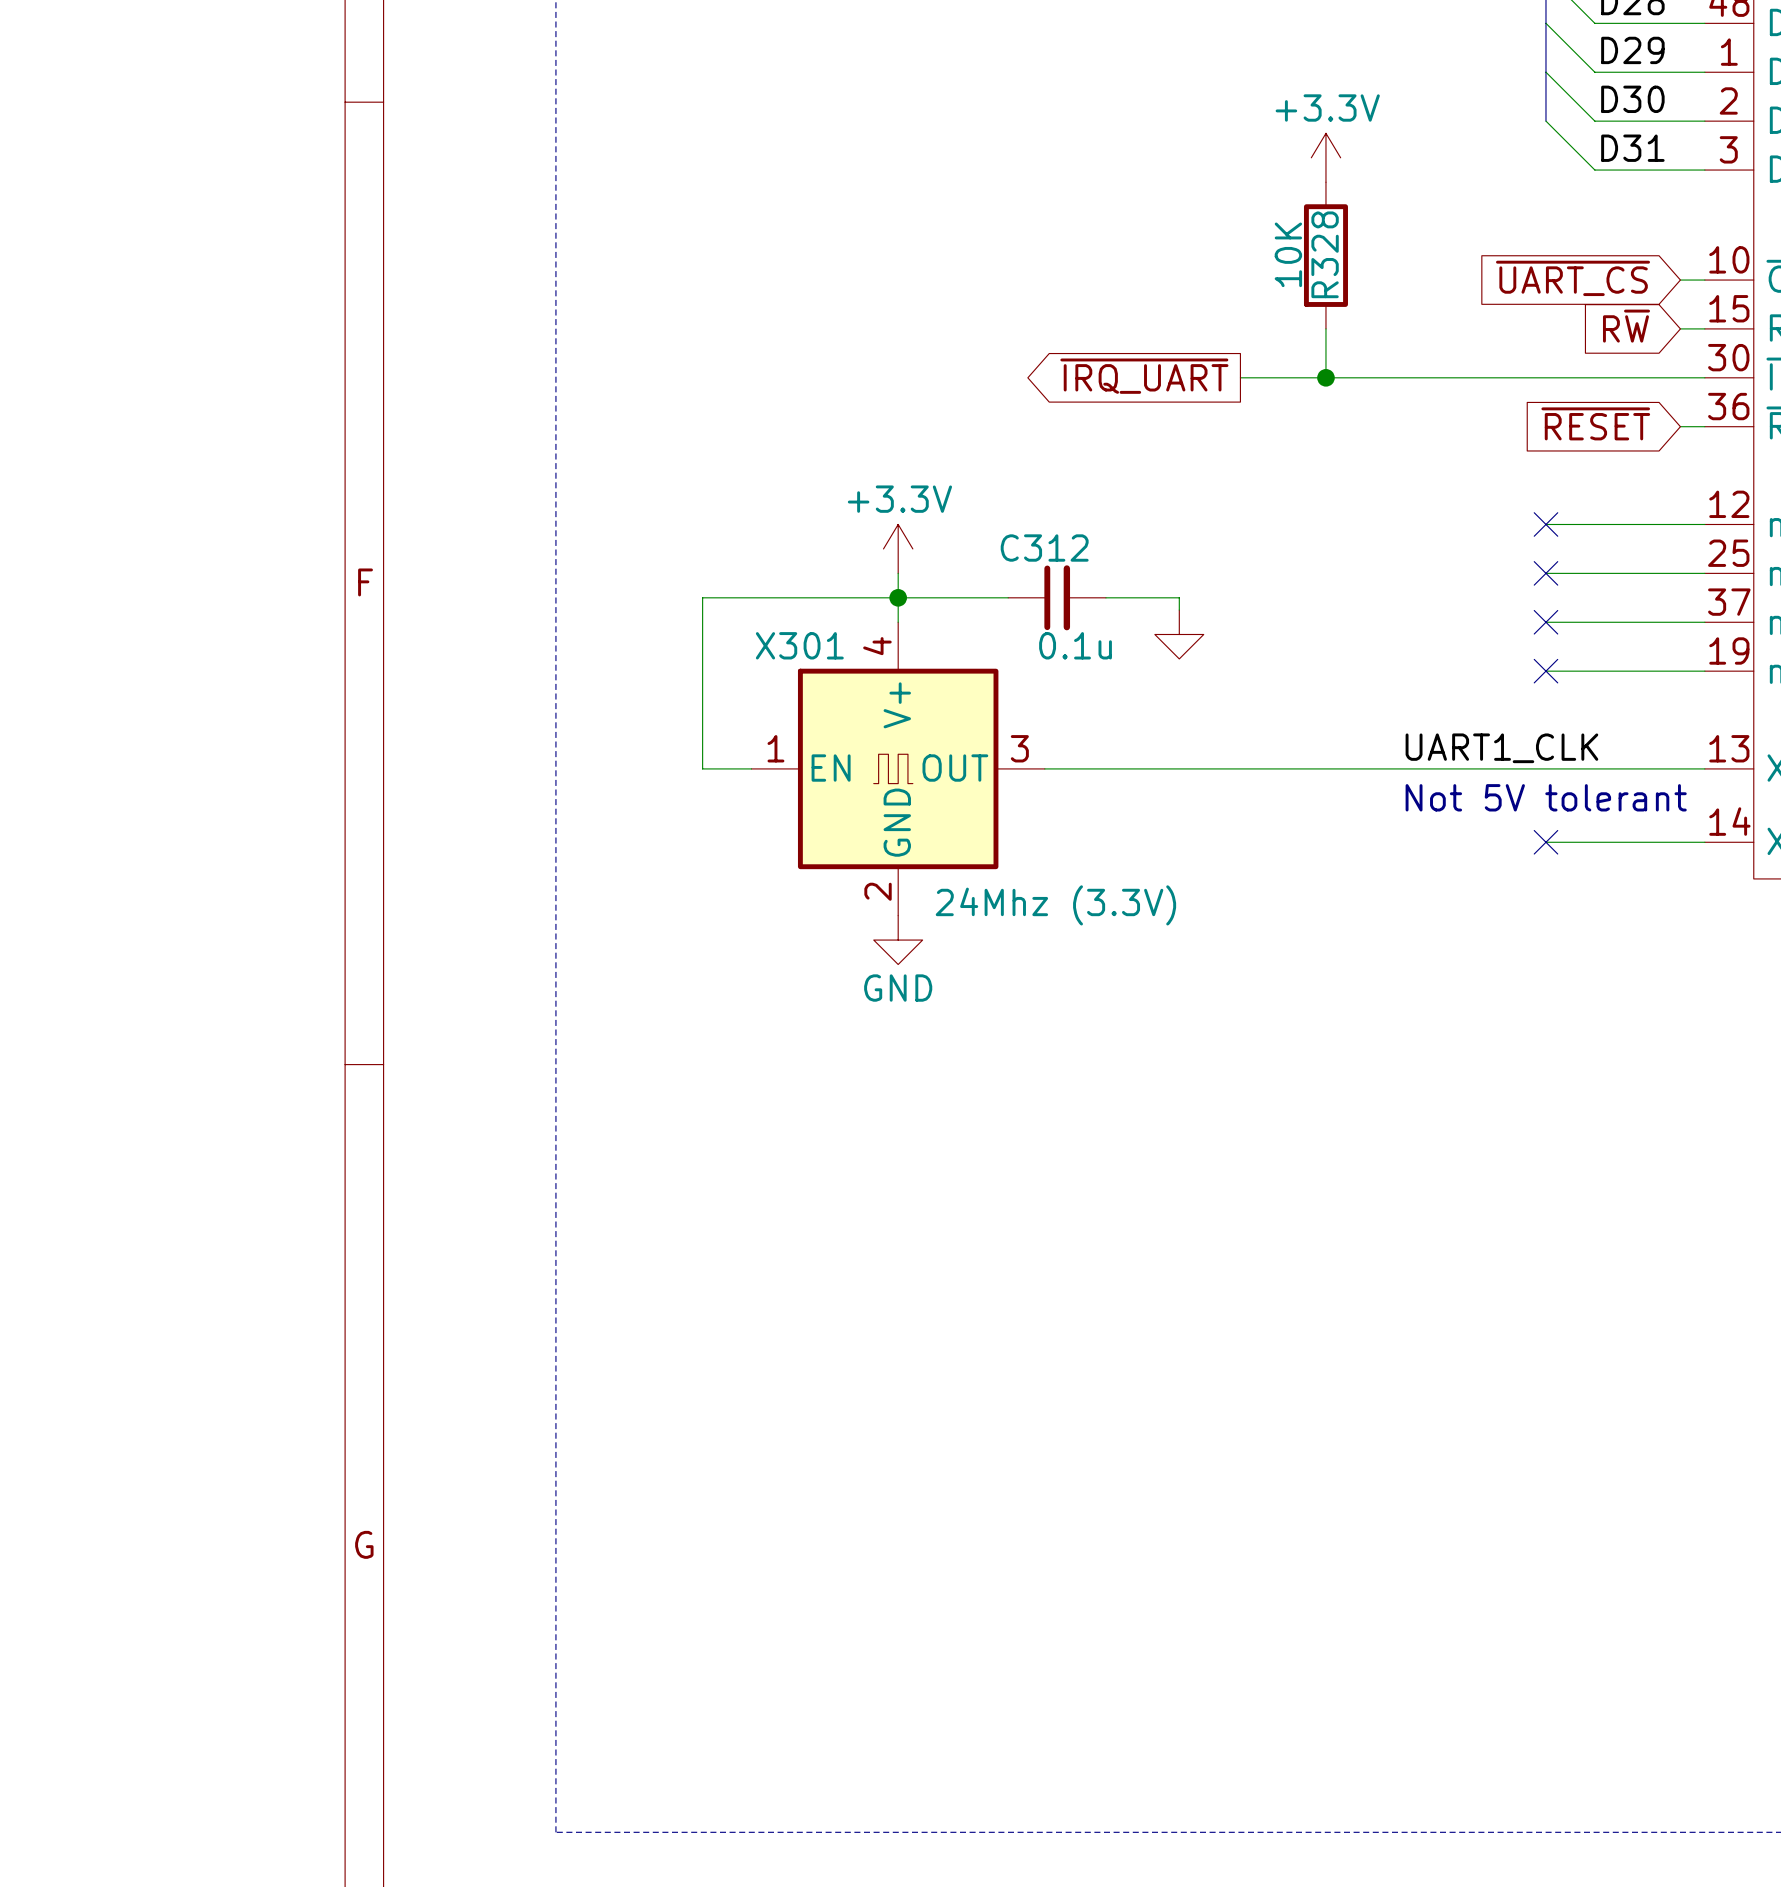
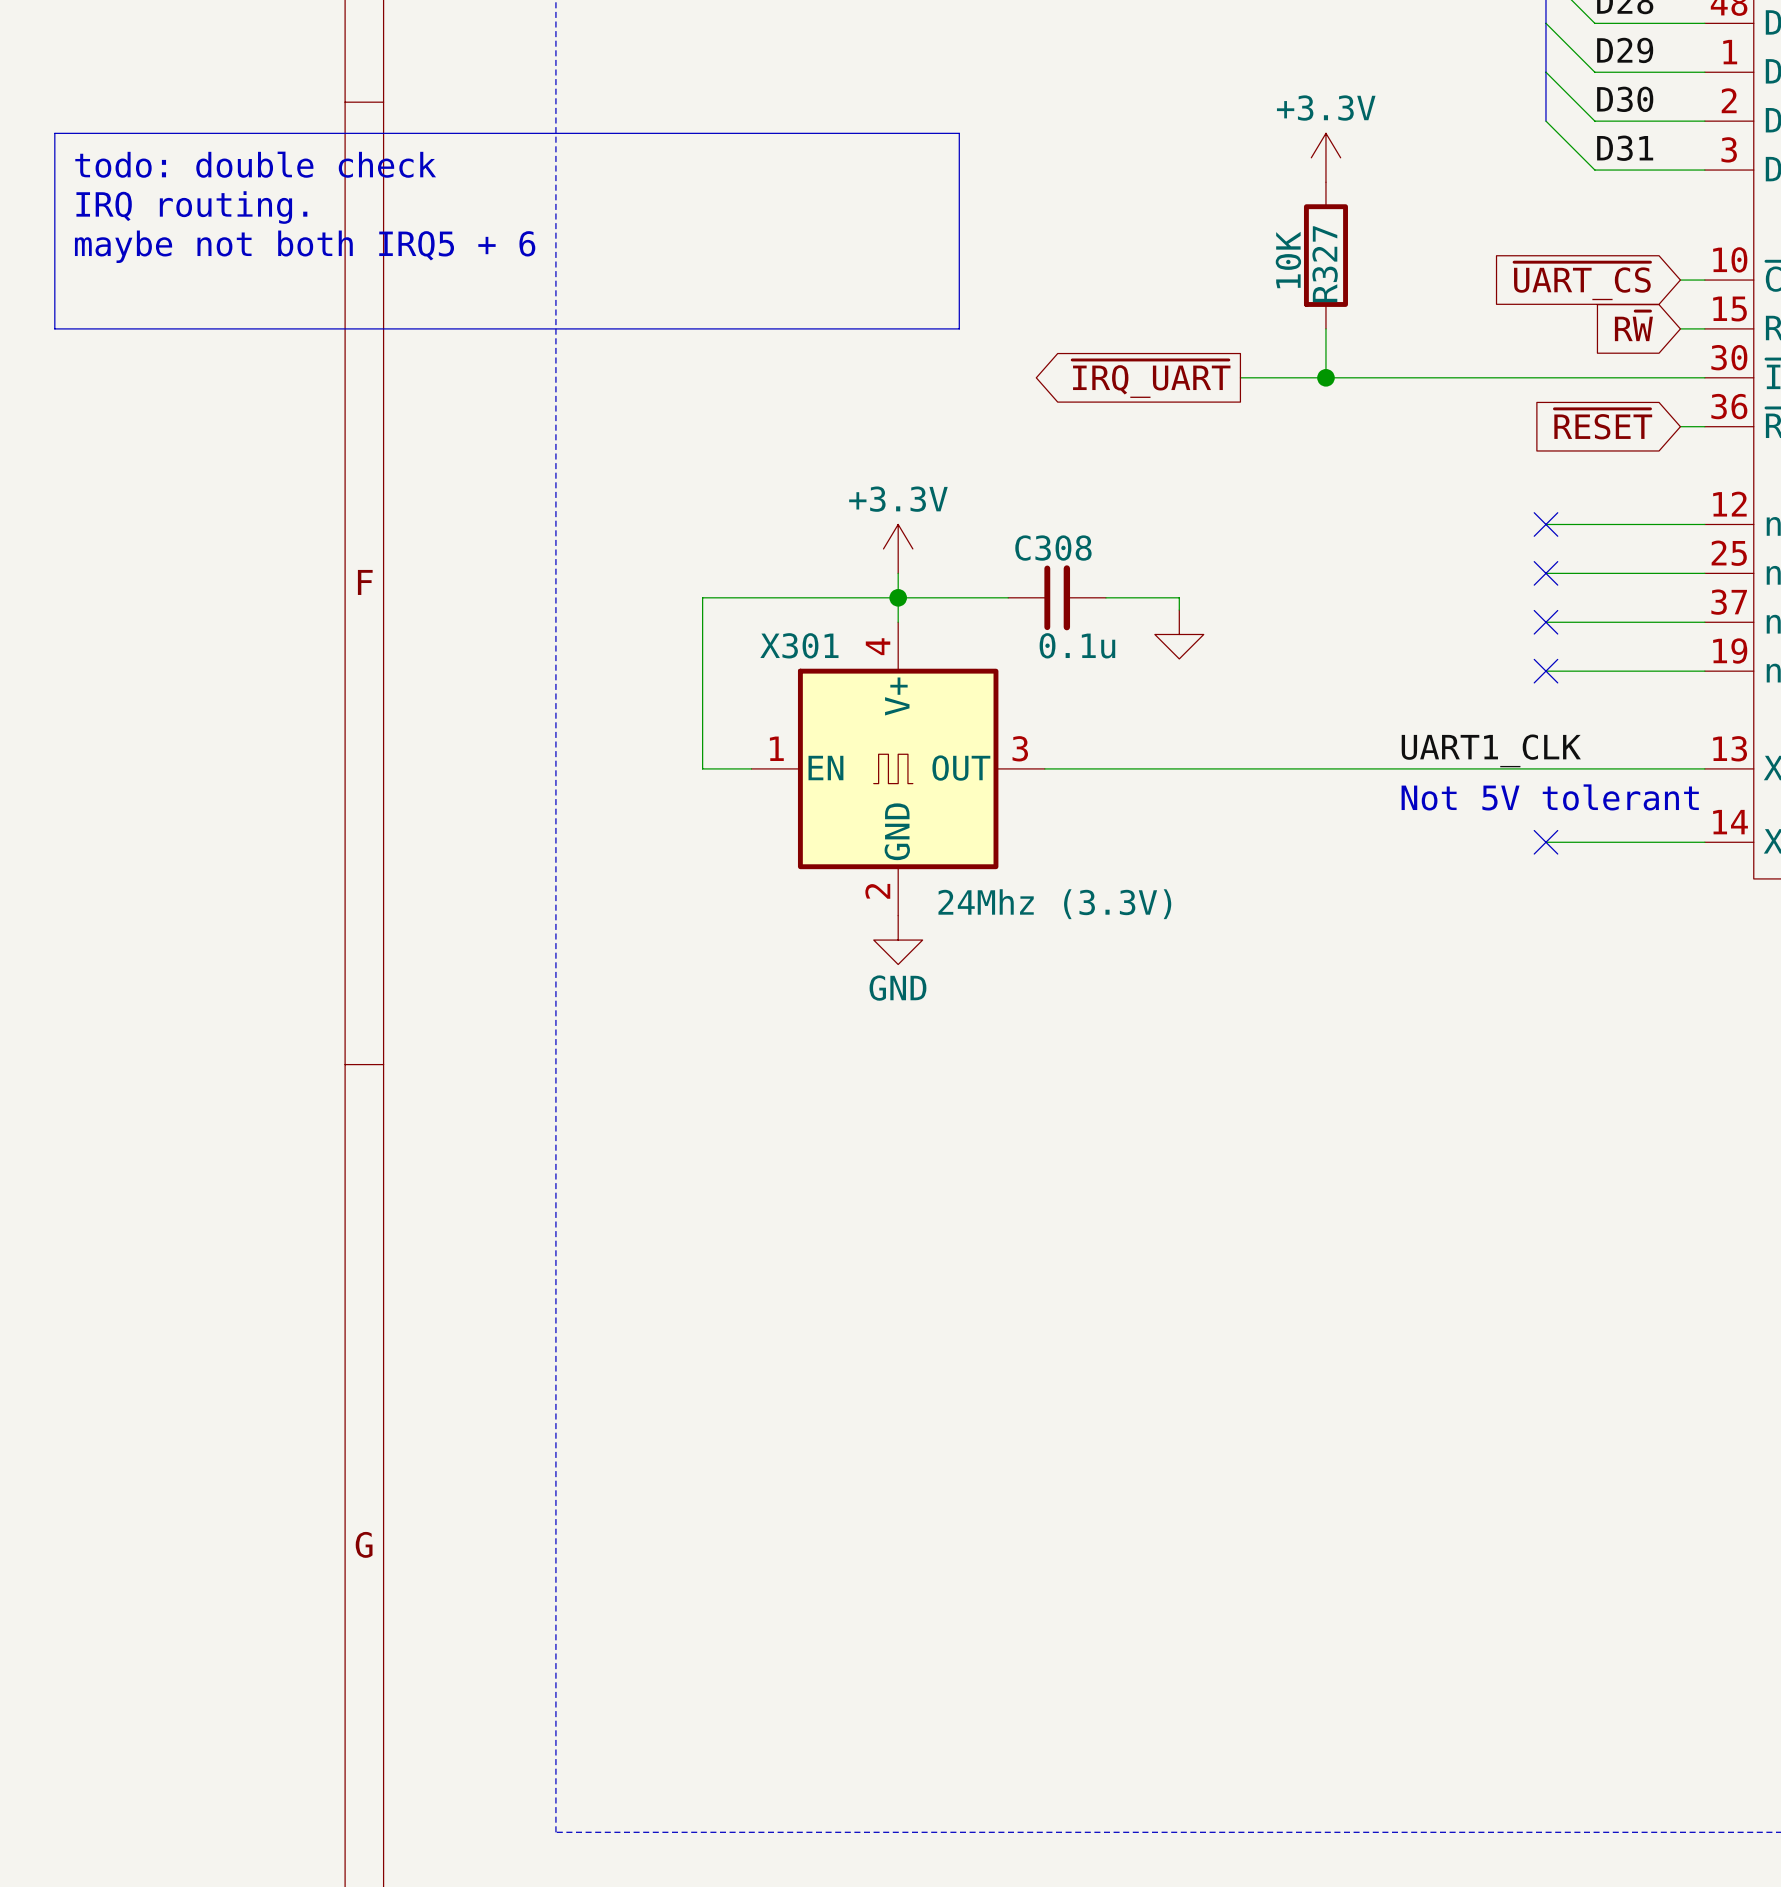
line: none -> (54, 133) (959, 133) (959, 328) (54, 328) (54, 133)
text: none -> todo: double check (255, 164)
text: none -> IRQ routing. (191, 207)
text: none -> maybe not both IRQ5 + 6 (305, 246)
R328 name: R328 (1325, 254) -> R327 (1325, 264)
C312 name: C312 (1044, 548) -> C308 (1053, 548)

